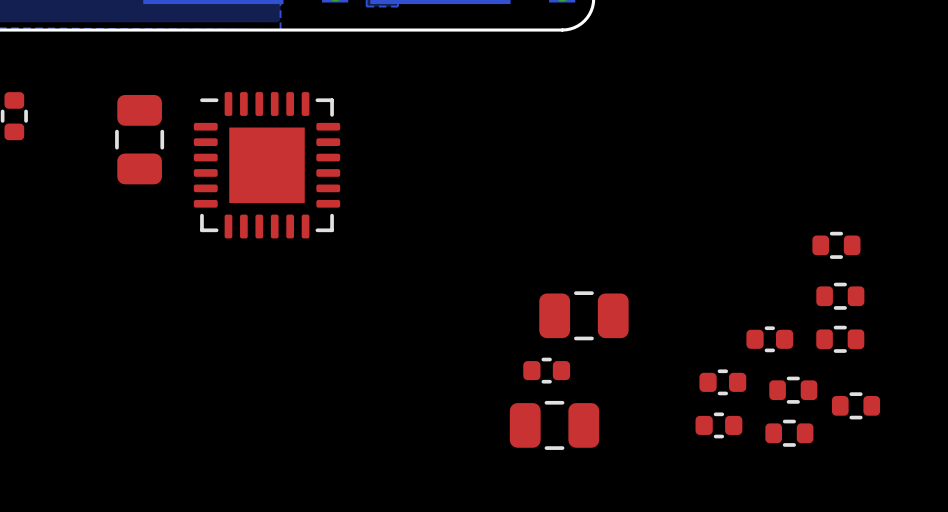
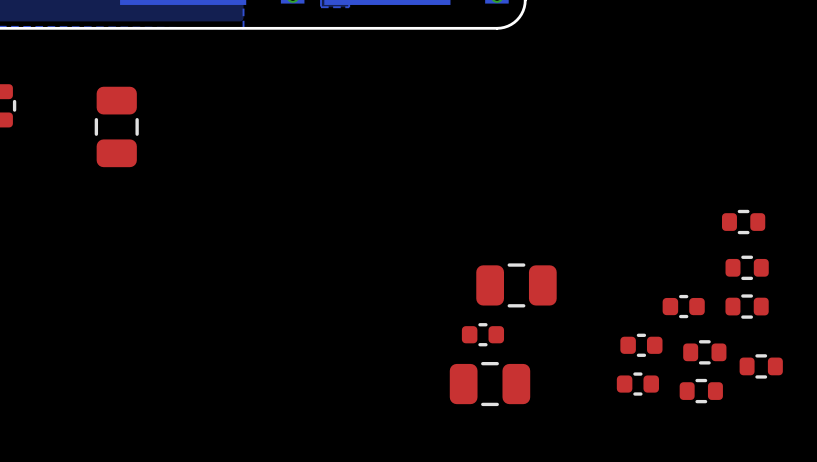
part: (267, 165) -> none

